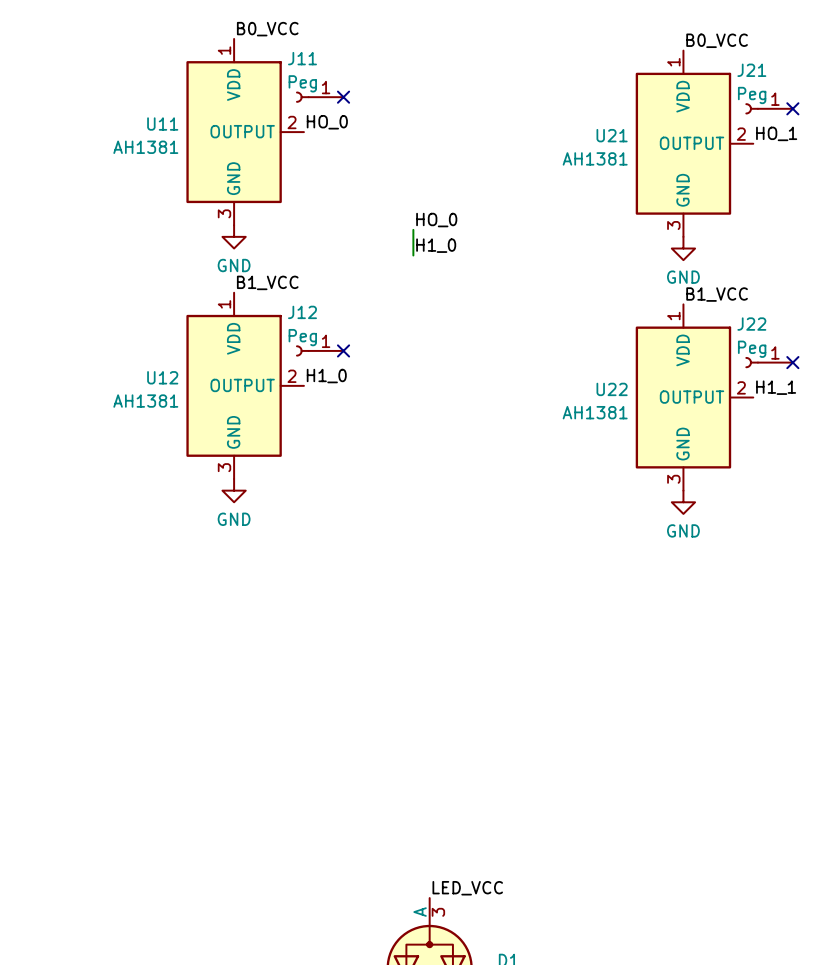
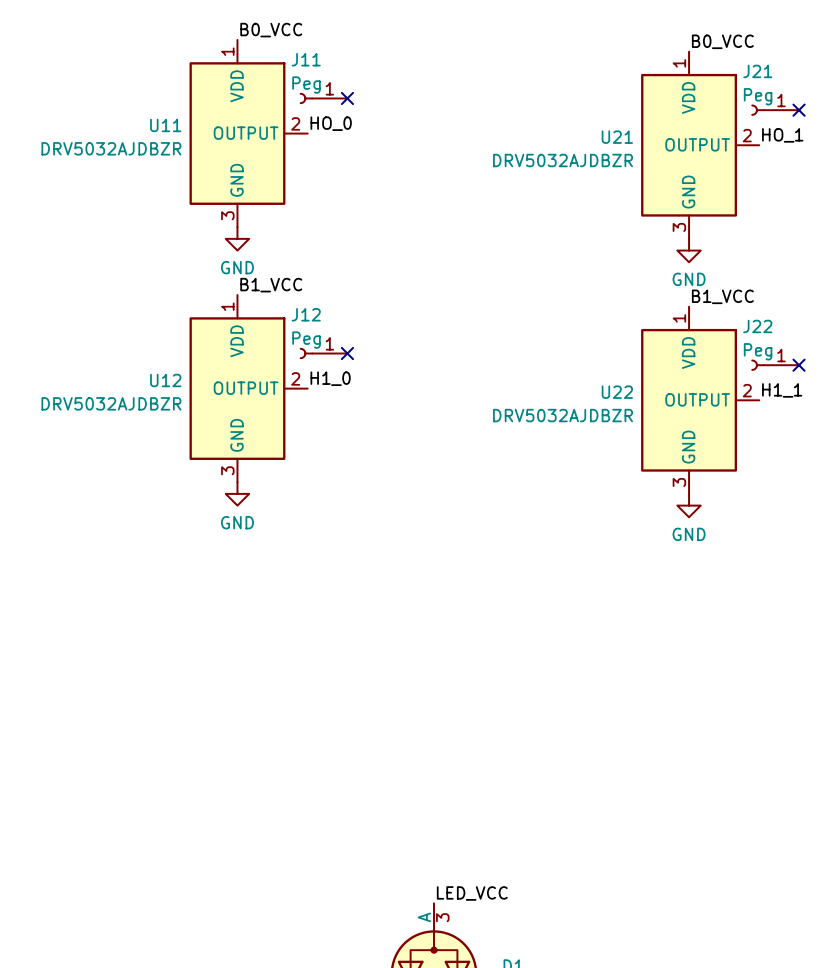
U11 value: AH1381 (145, 147) -> DRV5032AJDBZR (111, 148)
U21 value: AH1381 (595, 158) -> DRV5032AJDBZR (563, 160)
label: HO_0 (436, 220) -> none
wire: (413, 229) (413, 255) -> none
label: H1_0 (436, 245) -> none
U12 value: AH1381 (145, 401) -> DRV5032AJDBZR (111, 403)
U22 value: AH1381 (595, 412) -> DRV5032AJDBZR (563, 415)

